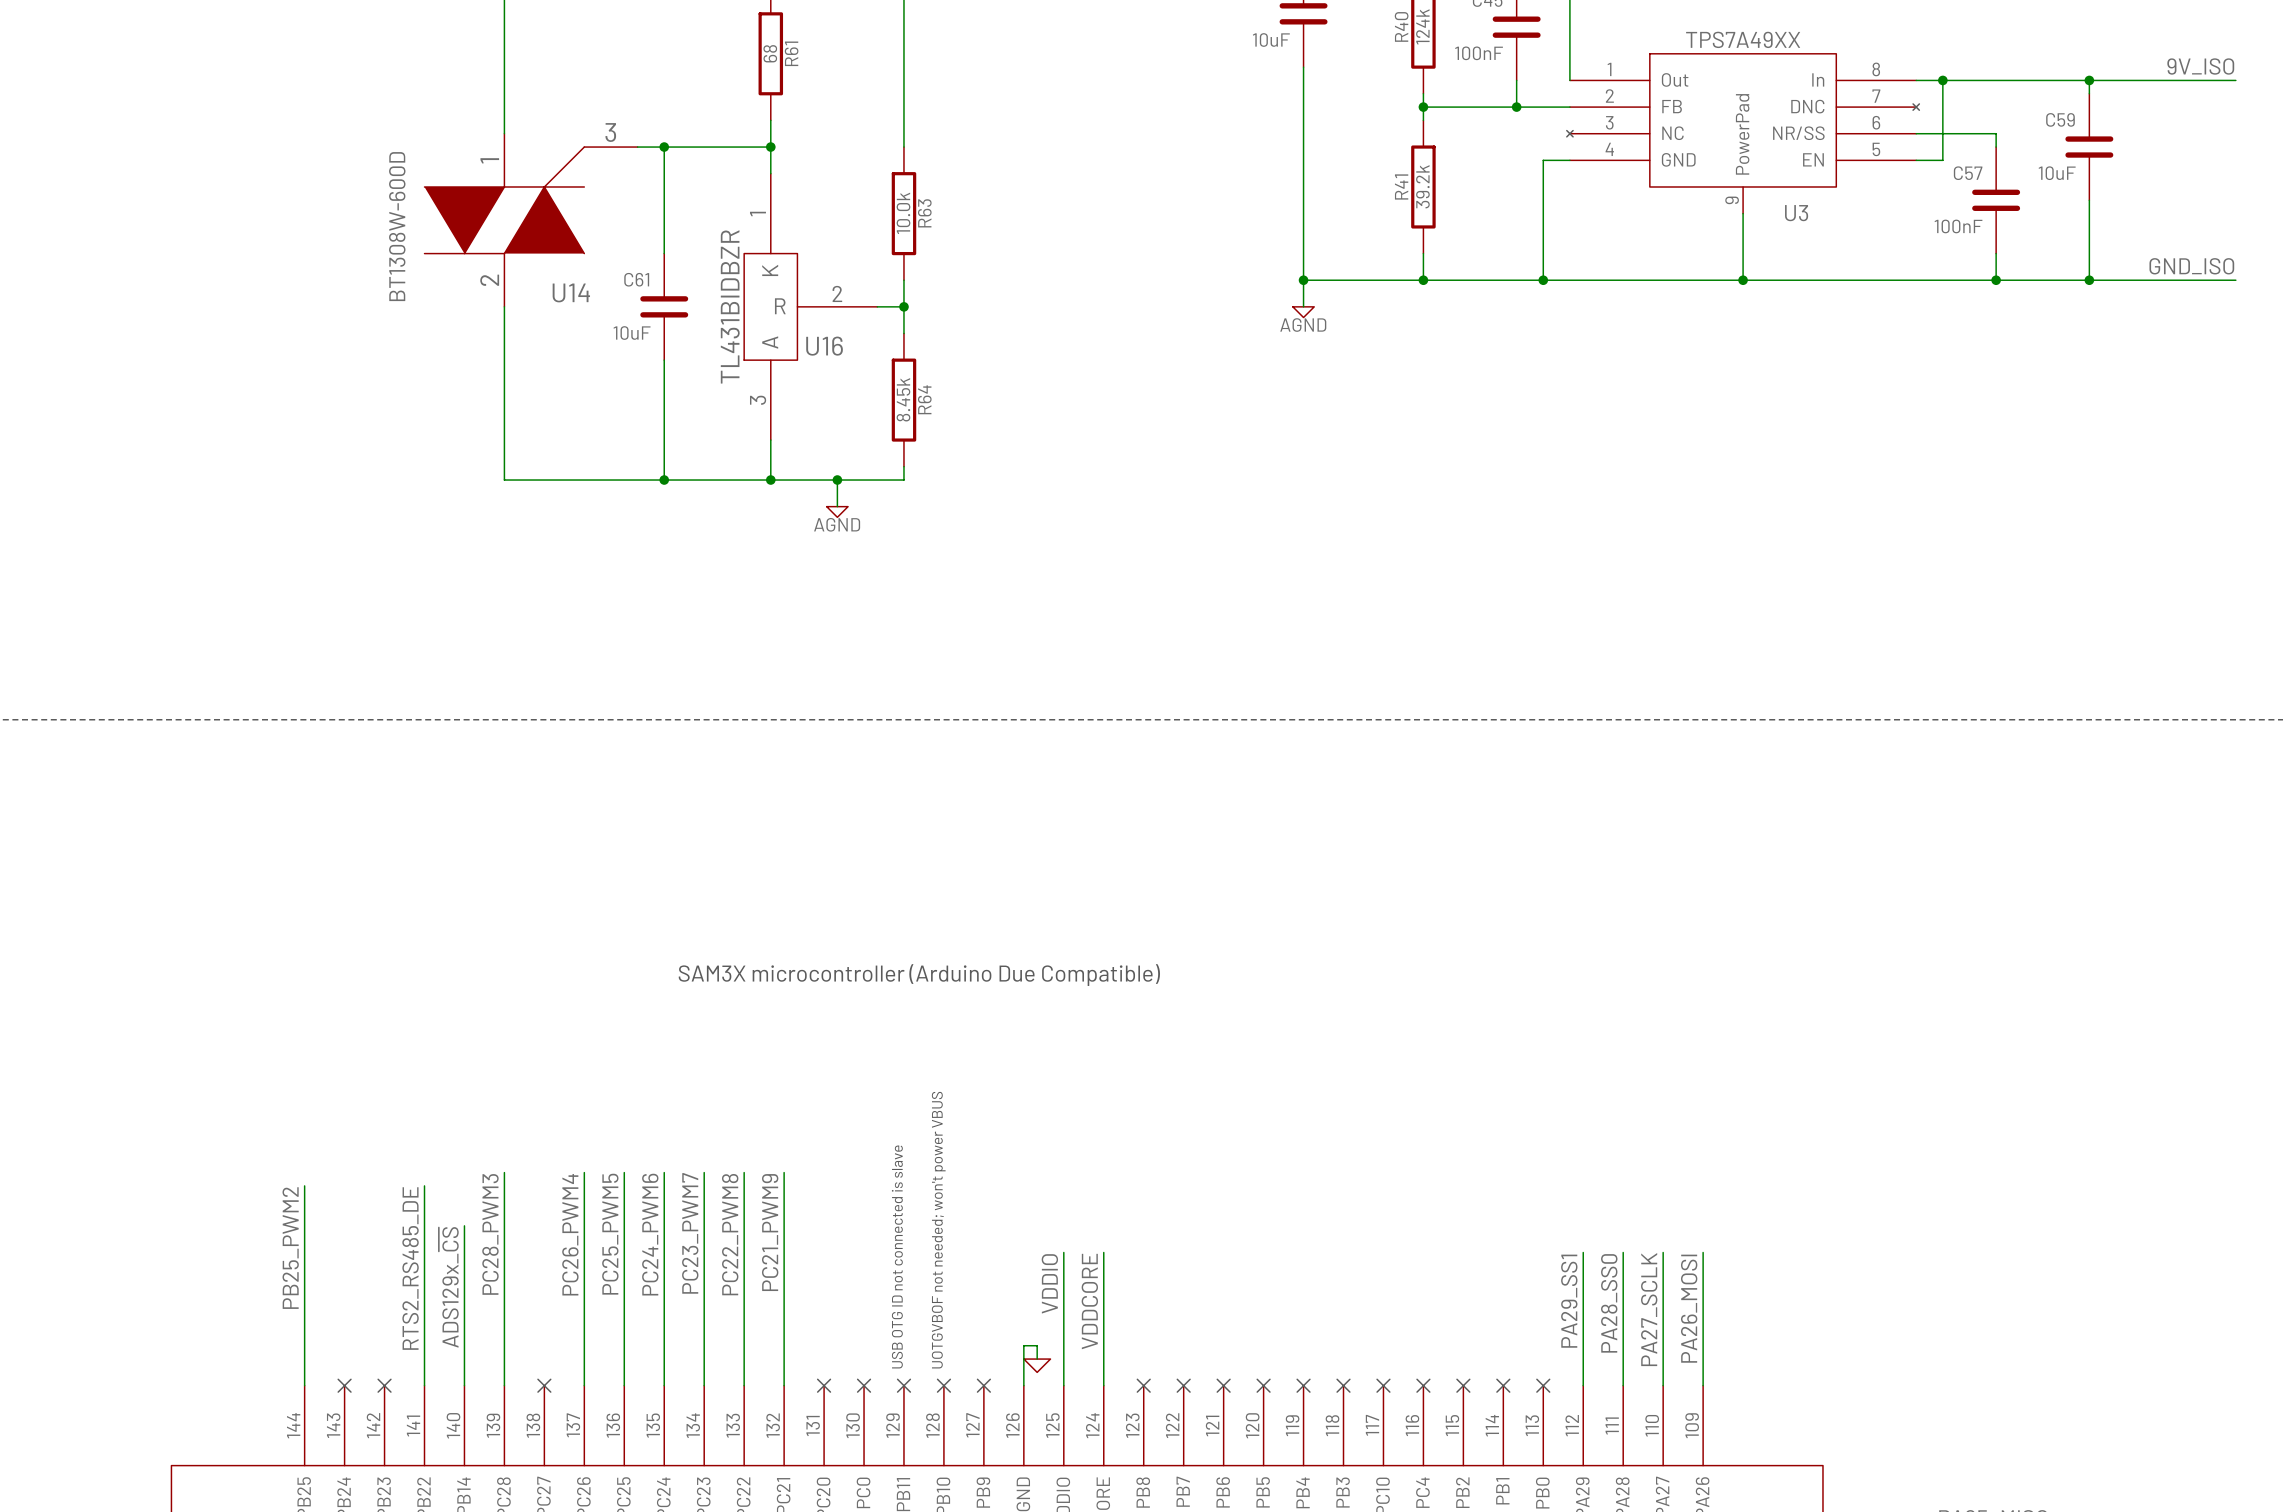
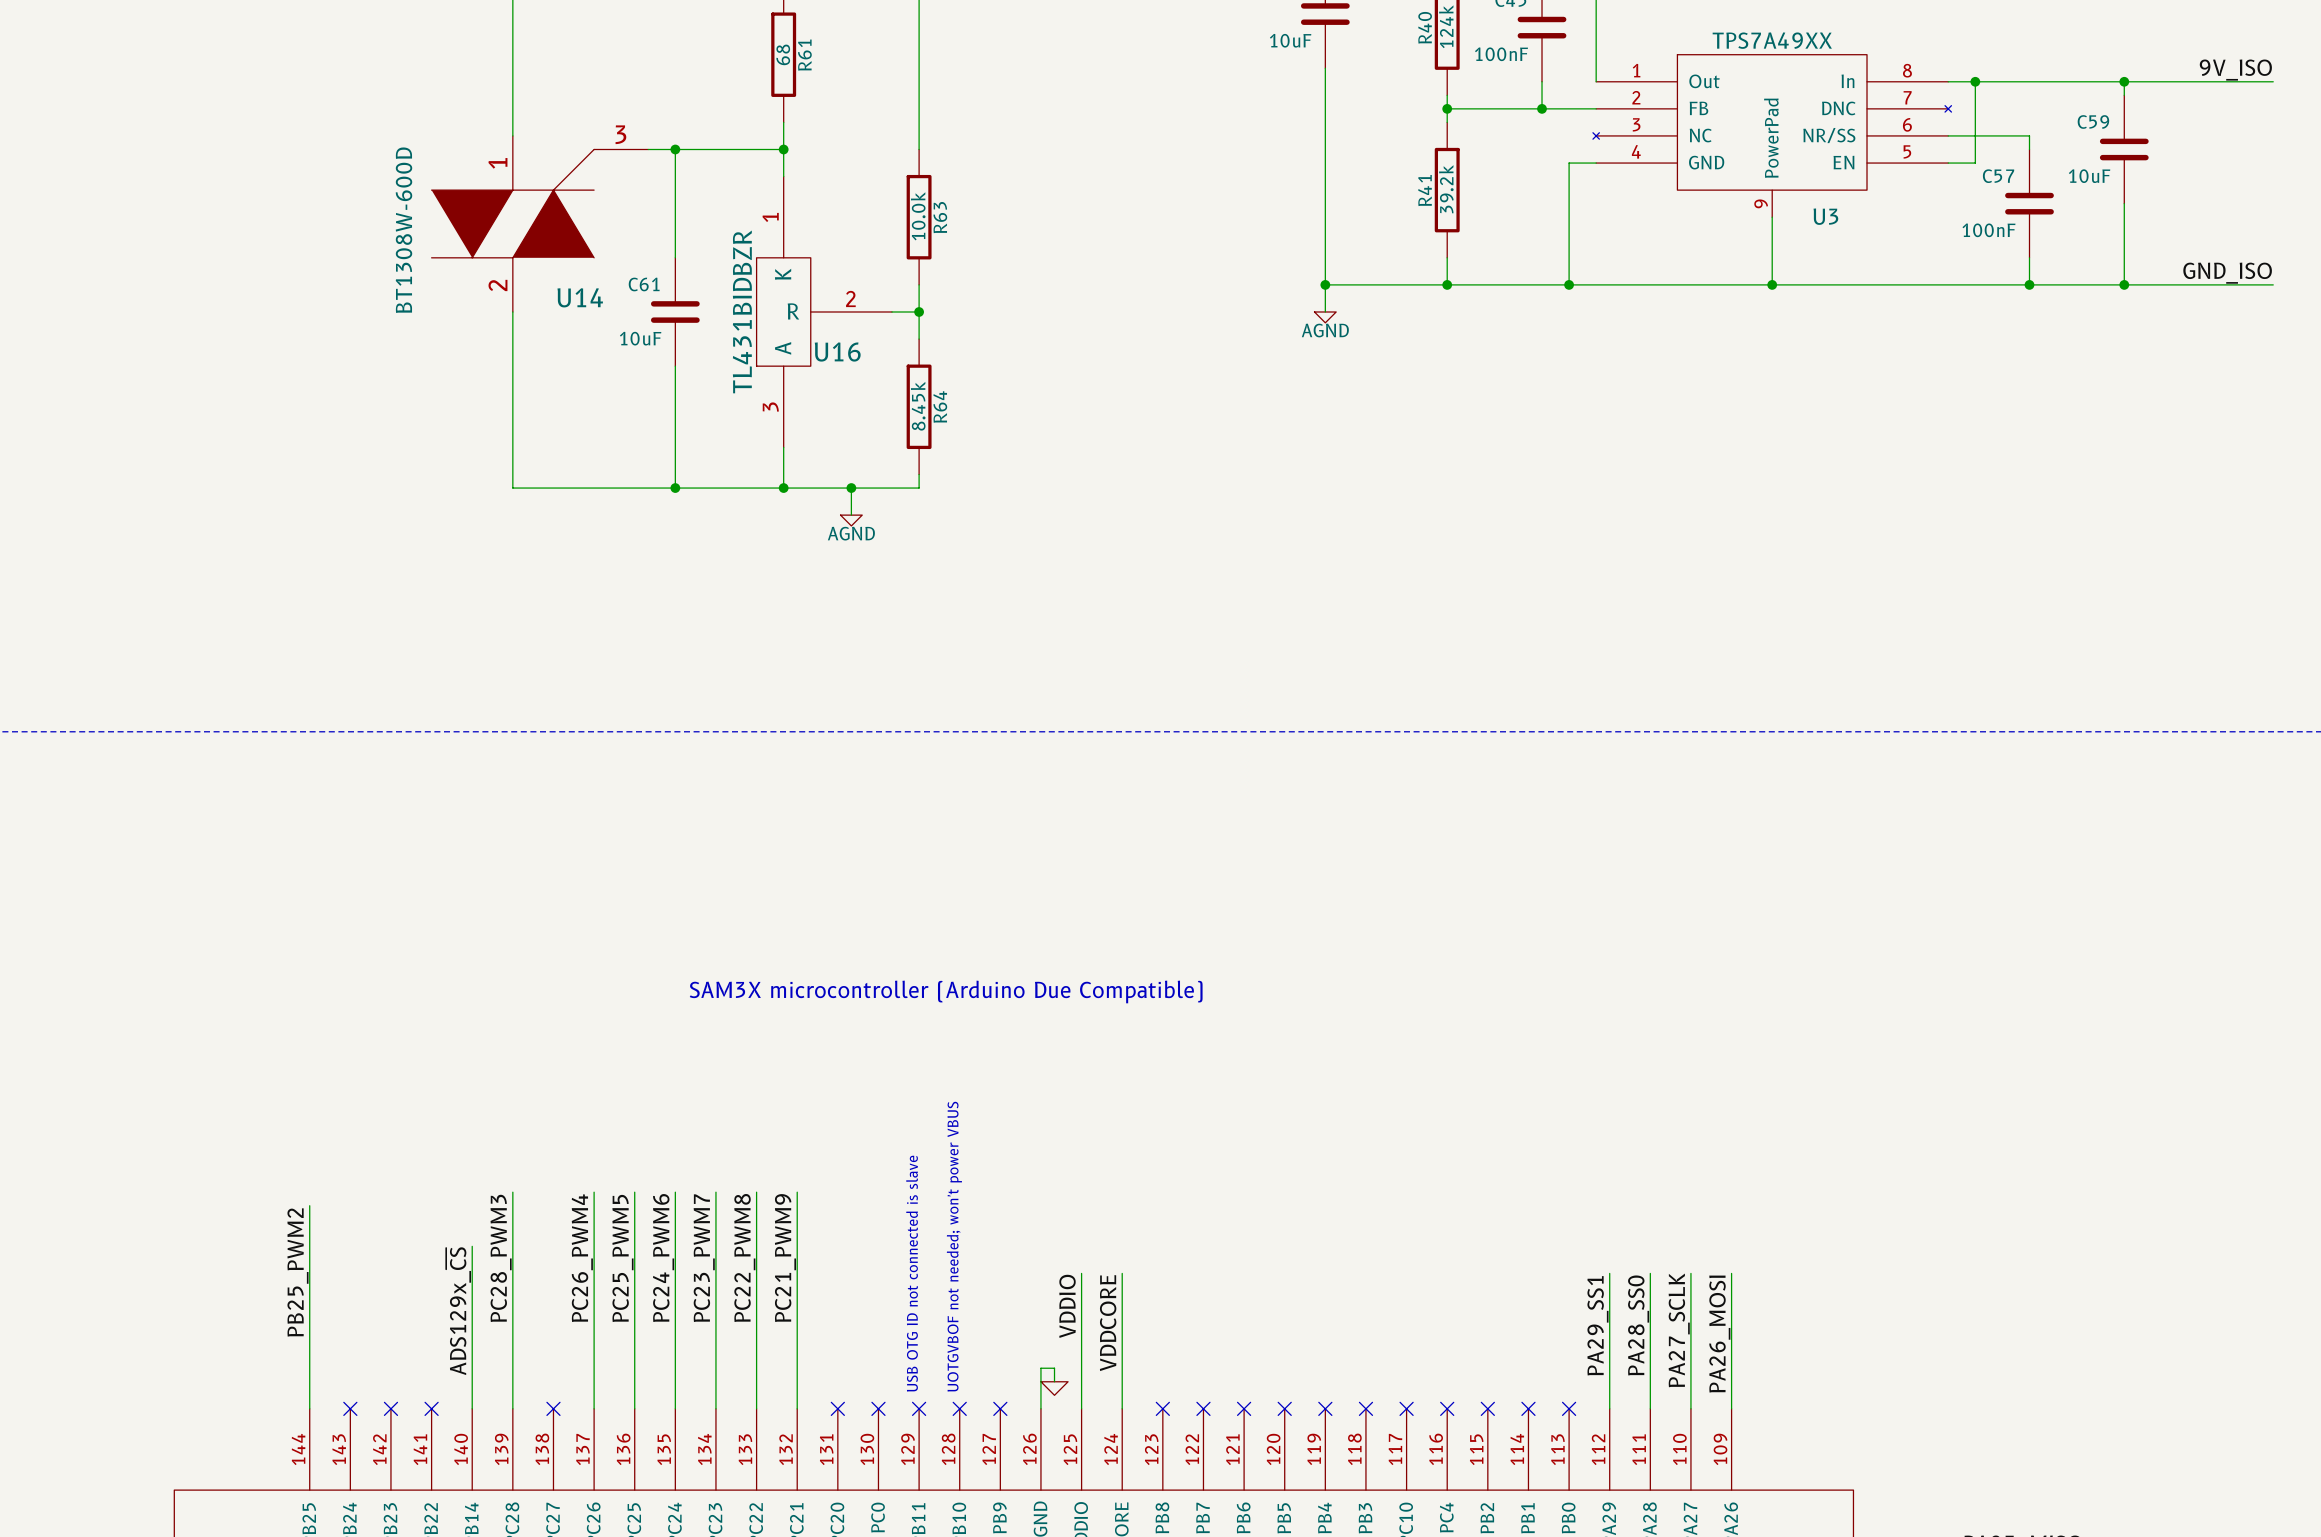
wire: (424, 1185) (424, 1385) -> none
label: RTS2_RS485_DE (410, 1268) -> none
no-connect mark: none -> (431, 1408)

